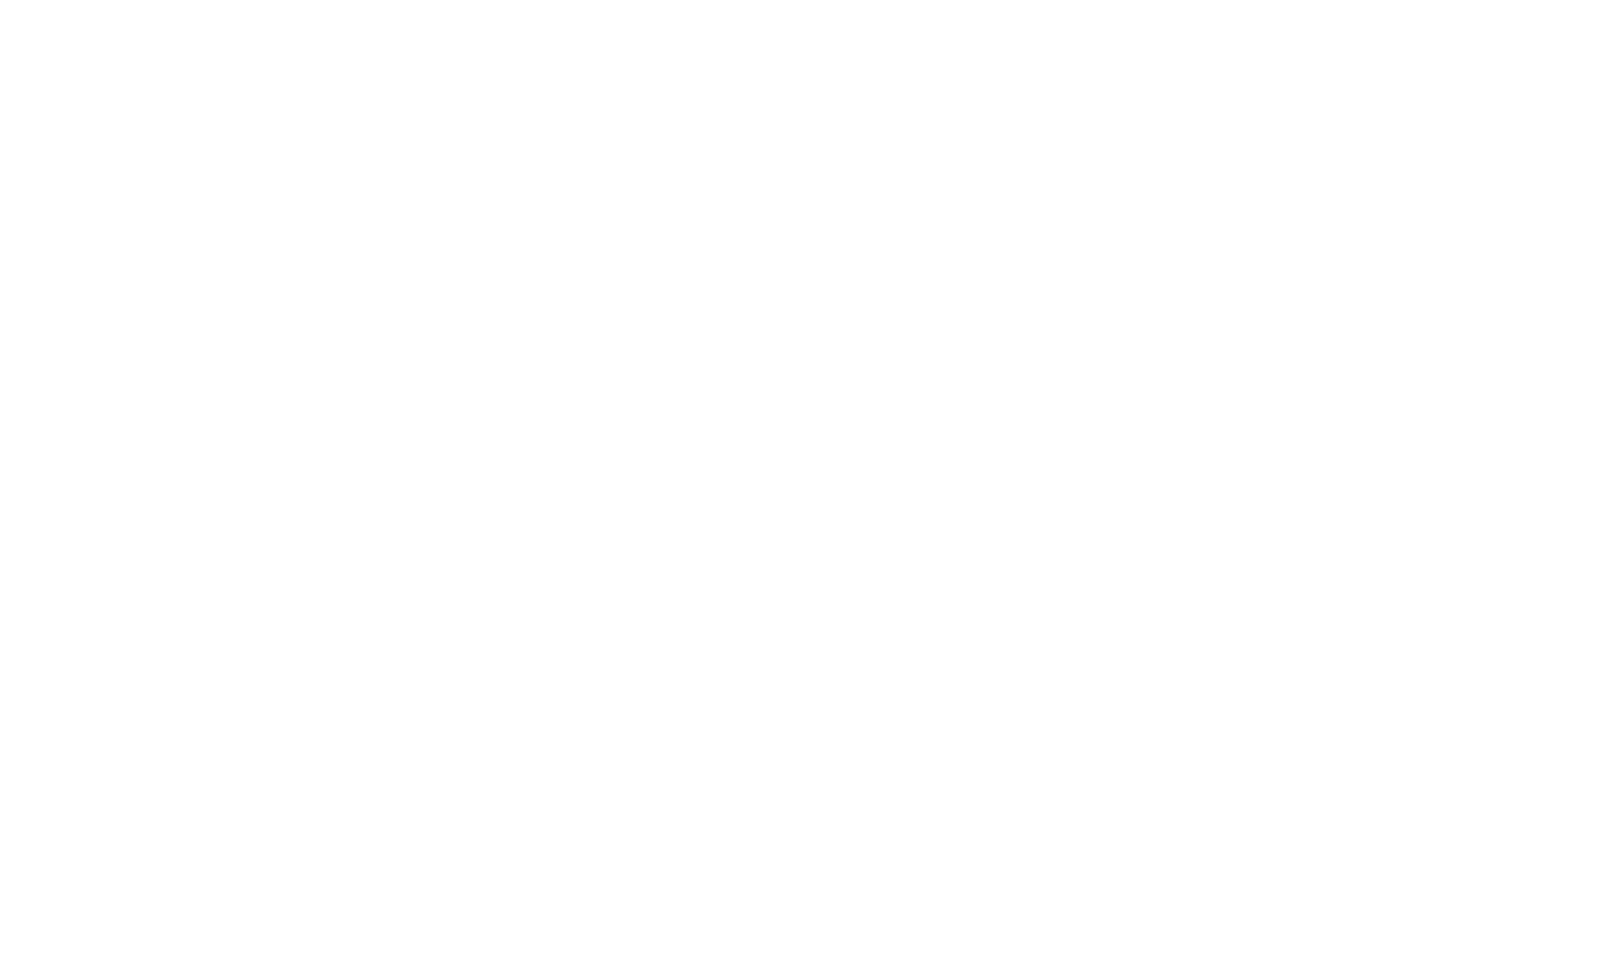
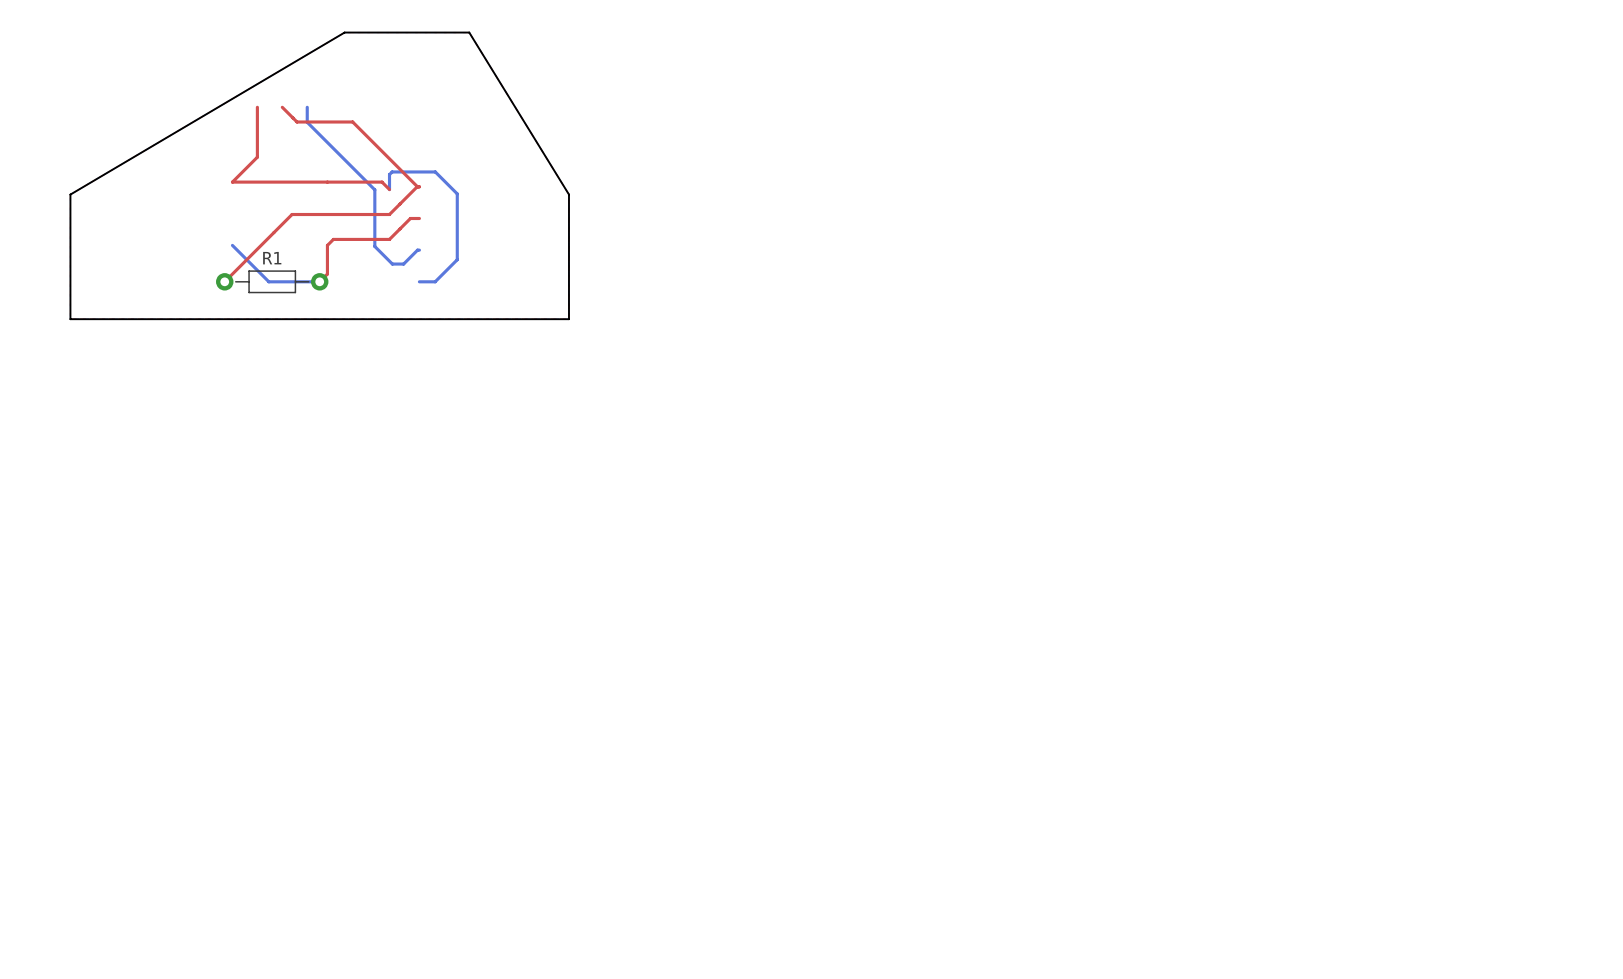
board edge: none -> (344, 32) (70, 194) (70, 319) (568, 319) (568, 194) (469, 32) (344, 32)
top track: none -> (257, 107) (257, 157) (232, 182) (382, 182) (389, 189)
top track: none -> (282, 107) (297, 122) (352, 122) (417, 186)
bottom track: none -> (307, 107) (307, 122) (374, 189) (374, 246) (392, 264) (403, 264) (419, 250)
top track: none -> (419, 186) (417, 186) (389, 214) (292, 214) (224, 281)
bottom track: none -> (389, 189) (389, 174) (392, 171) (435, 171) (457, 193) (457, 259) (435, 281) (419, 281)
top track: none -> (419, 218) (410, 218) (389, 239) (333, 239) (327, 245) (327, 274) (319, 281)
bottom track: none -> (232, 245) (268, 281) (319, 281)
R1: none -> (272, 281)

